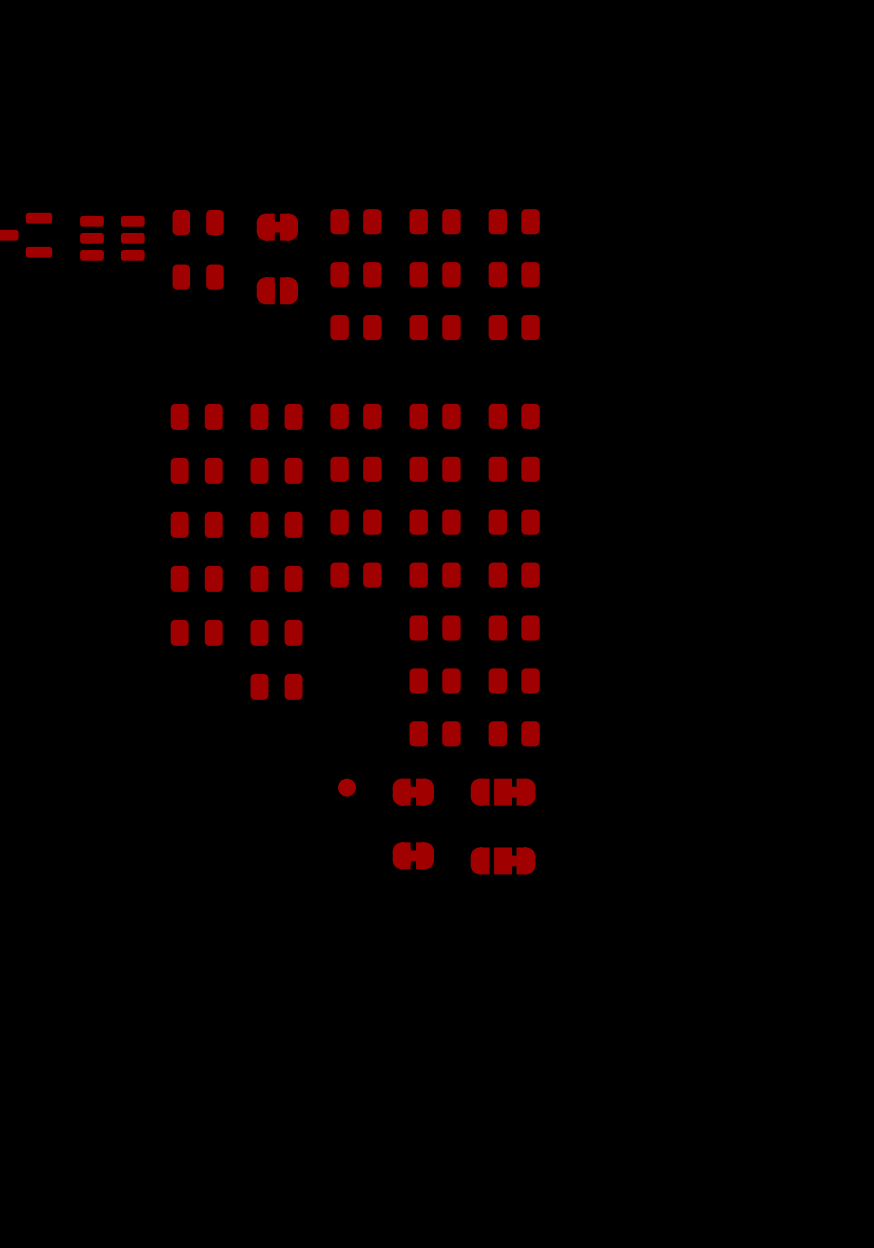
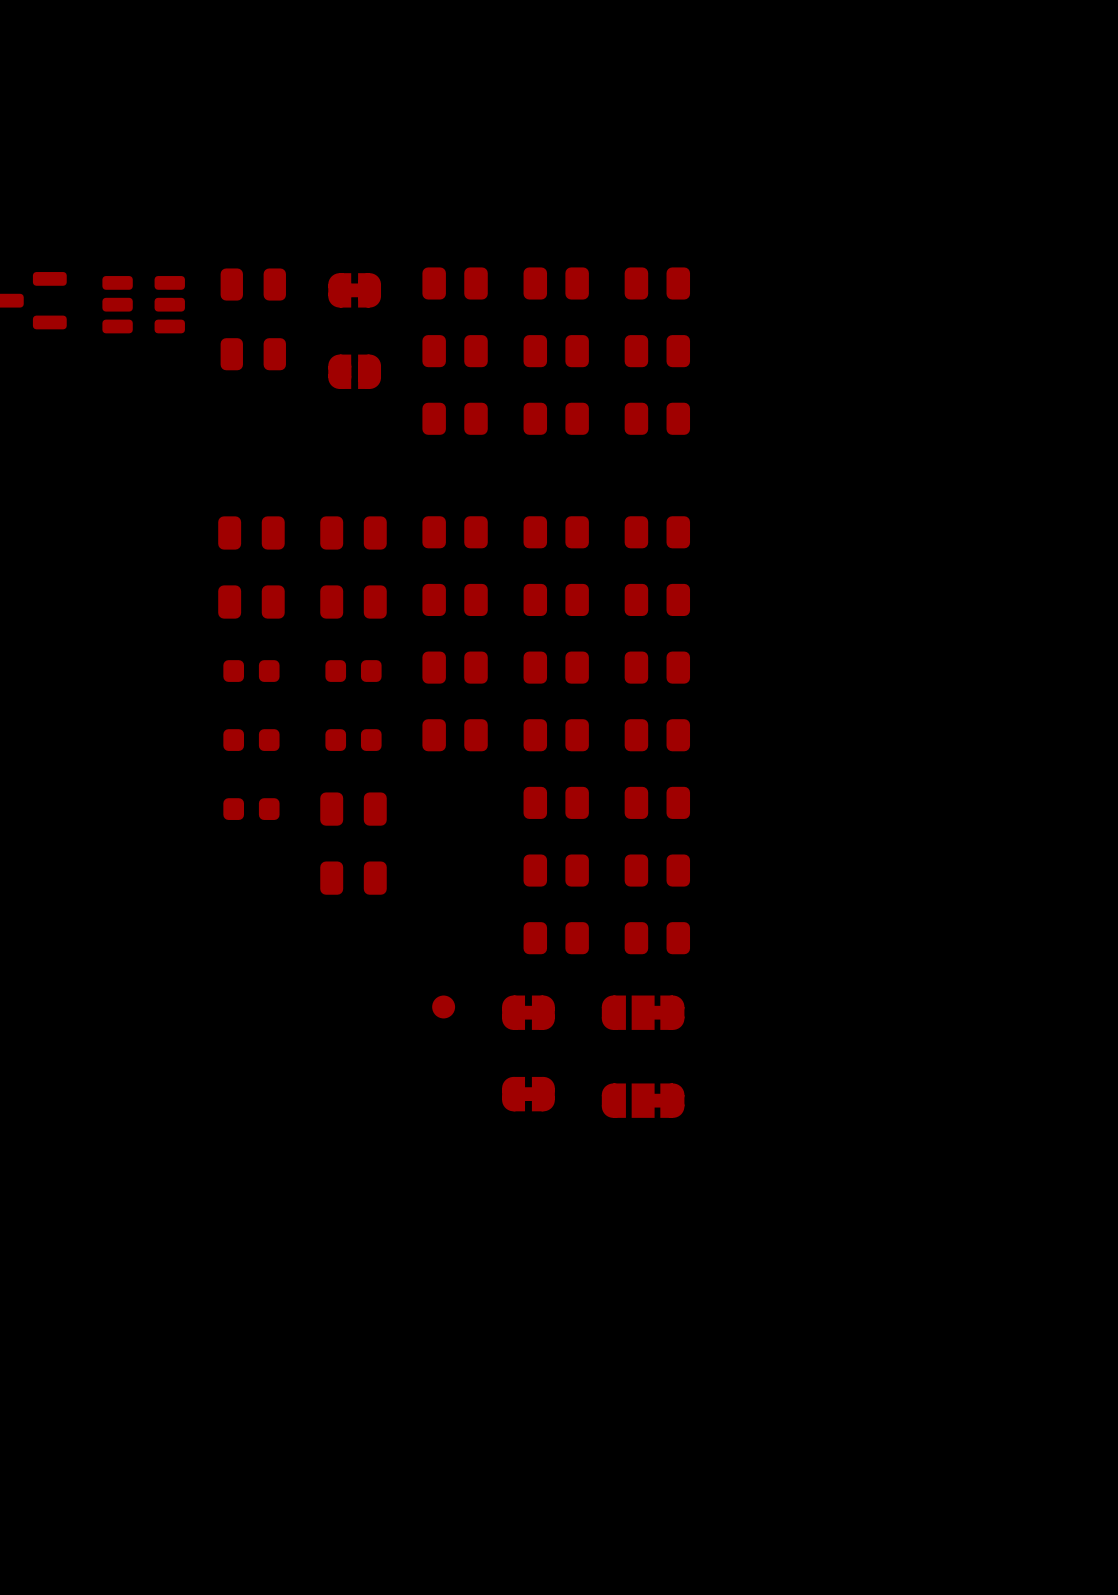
part footprint: [170, 511, 223, 538] -> [223, 660, 280, 682]
part footprint: [250, 511, 303, 538] -> [325, 660, 382, 682]
part footprint: [170, 565, 223, 592] -> [223, 729, 280, 751]
part footprint: [250, 565, 303, 592] -> [325, 729, 382, 751]
part footprint: [170, 619, 223, 646] -> [223, 798, 280, 820]

